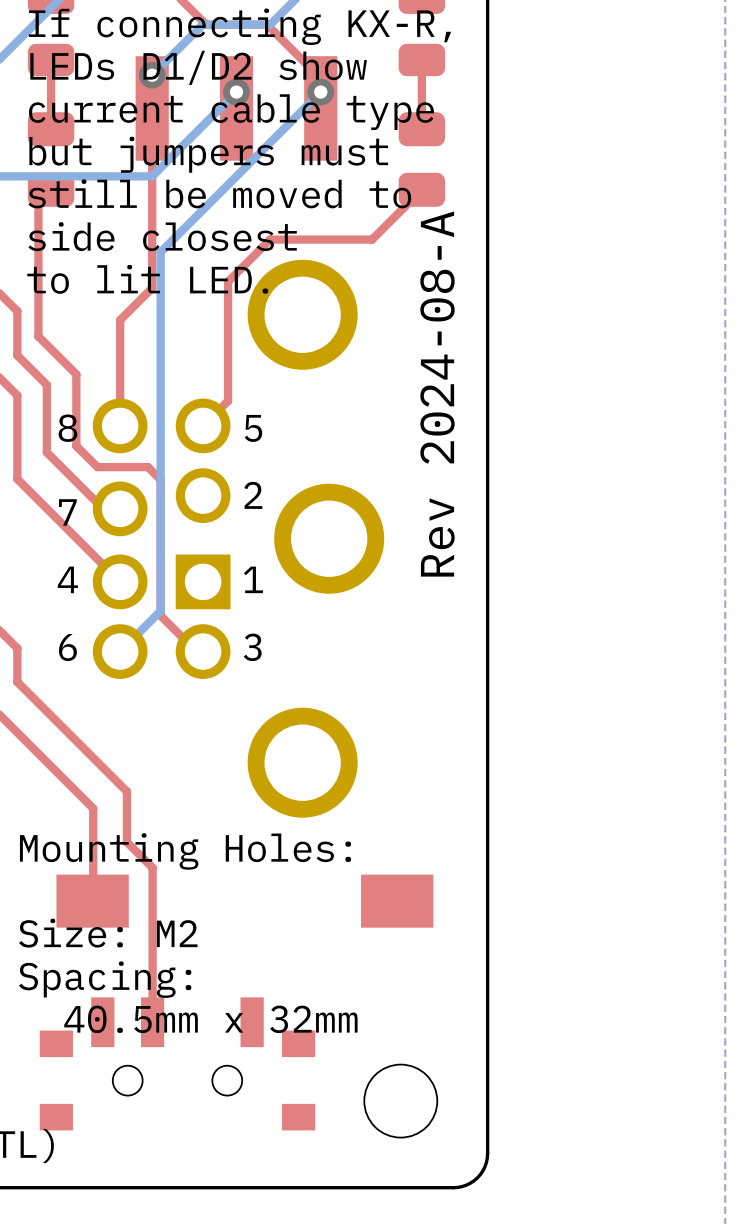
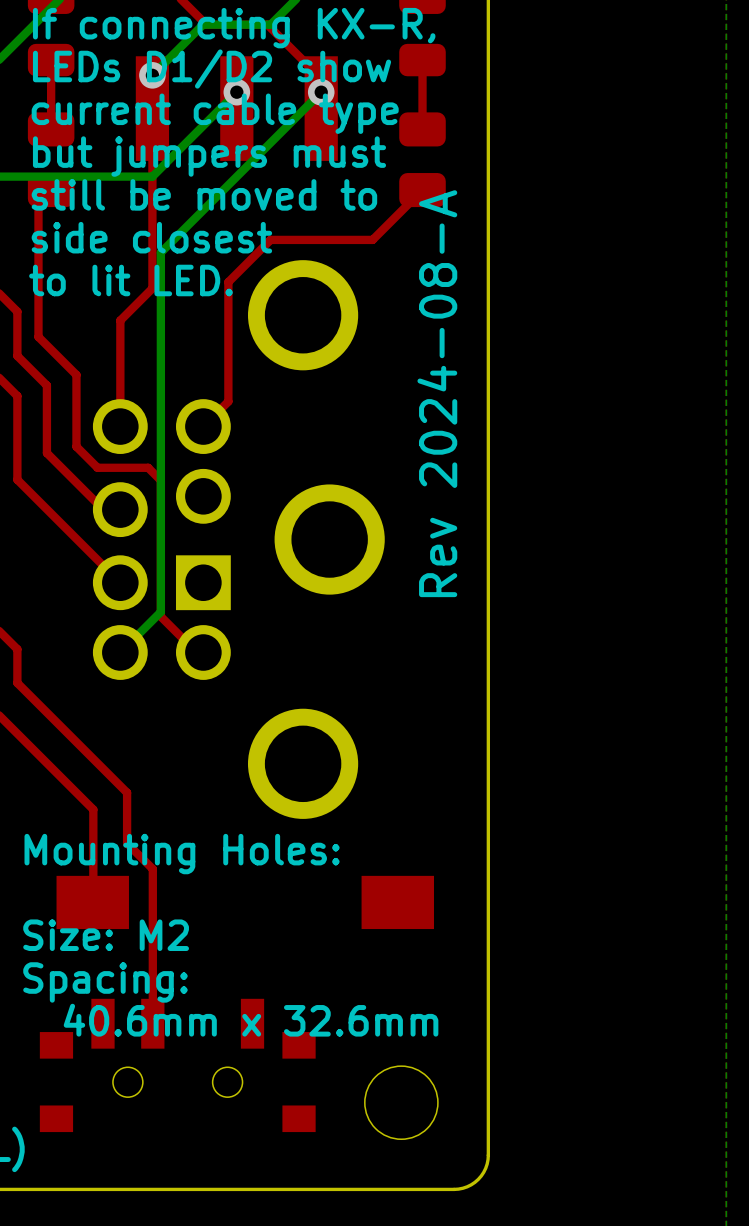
text: 8 (67, 428) -> none
text: 5 (253, 428) -> none
text: 2 (253, 495) -> none
text: 7 (67, 512) -> none
text: 4 (67, 579) -> none
text: 1 (253, 579) -> none
text: 6 (67, 647) -> none
text: 3 (252, 647) -> none
text: 40.5mm x 32mm (210, 1019) -> 40.6mm x 32.6mm (251, 1020)

